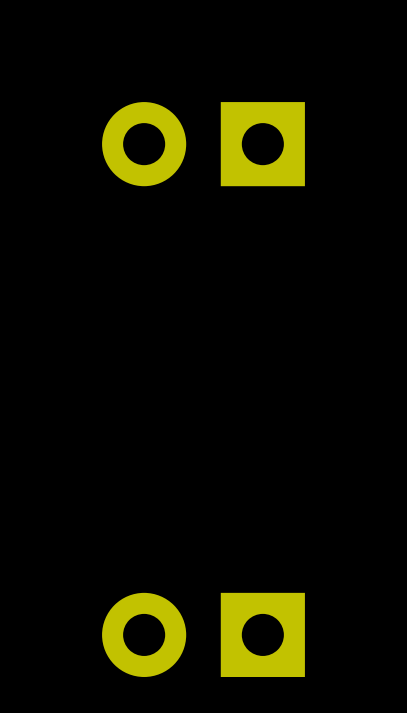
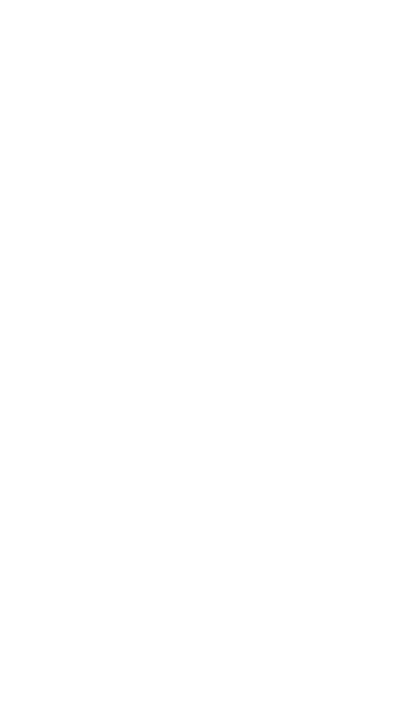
part: (203, 144) -> none
part: (203, 634) -> none

